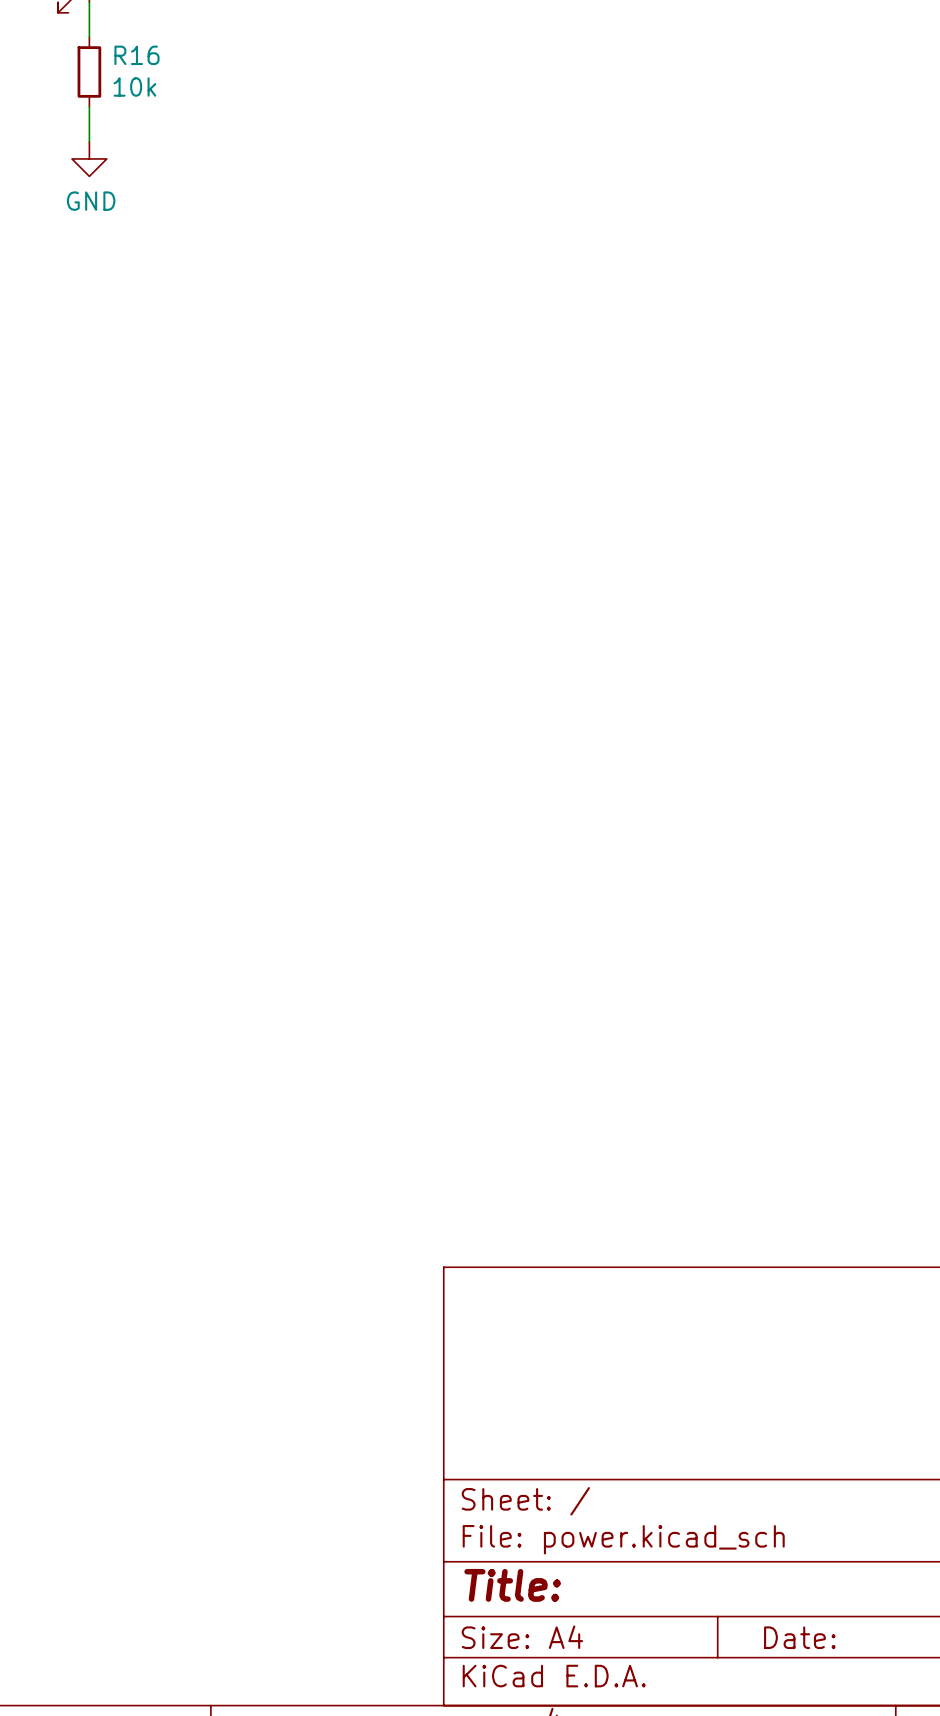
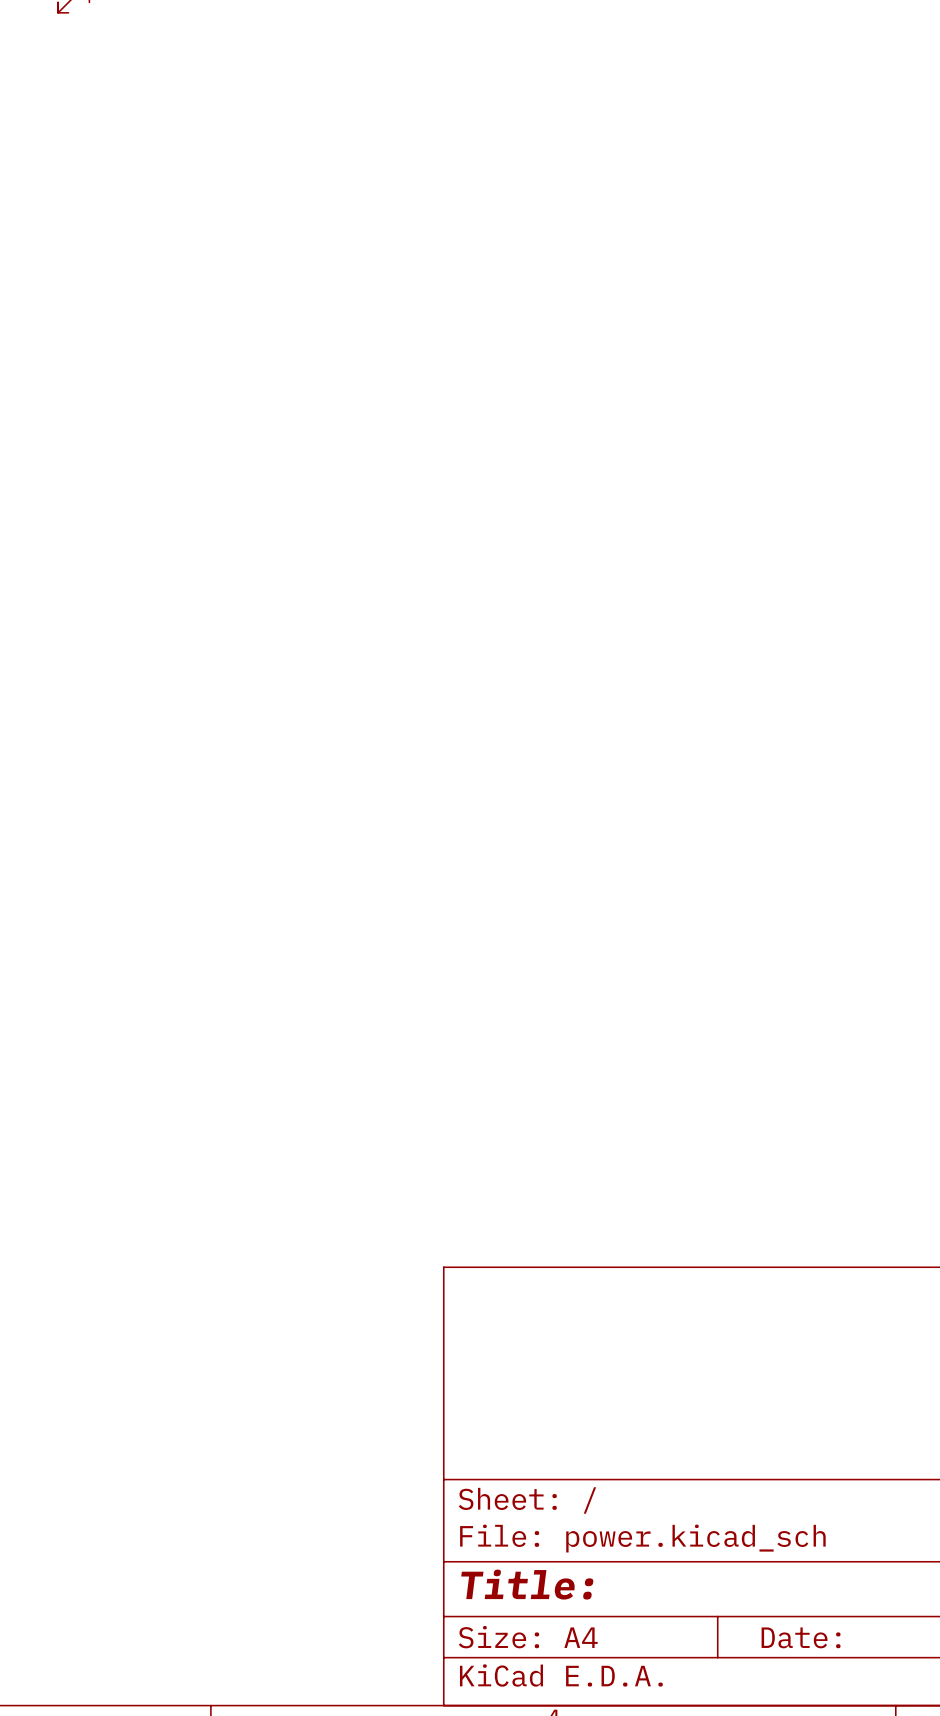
wire: (89, 2) (89, 37) -> none
R16: 10k (89, 71) -> none
wire: (89, 106) (89, 141) -> none
power symbol: GND (89, 158) -> none

